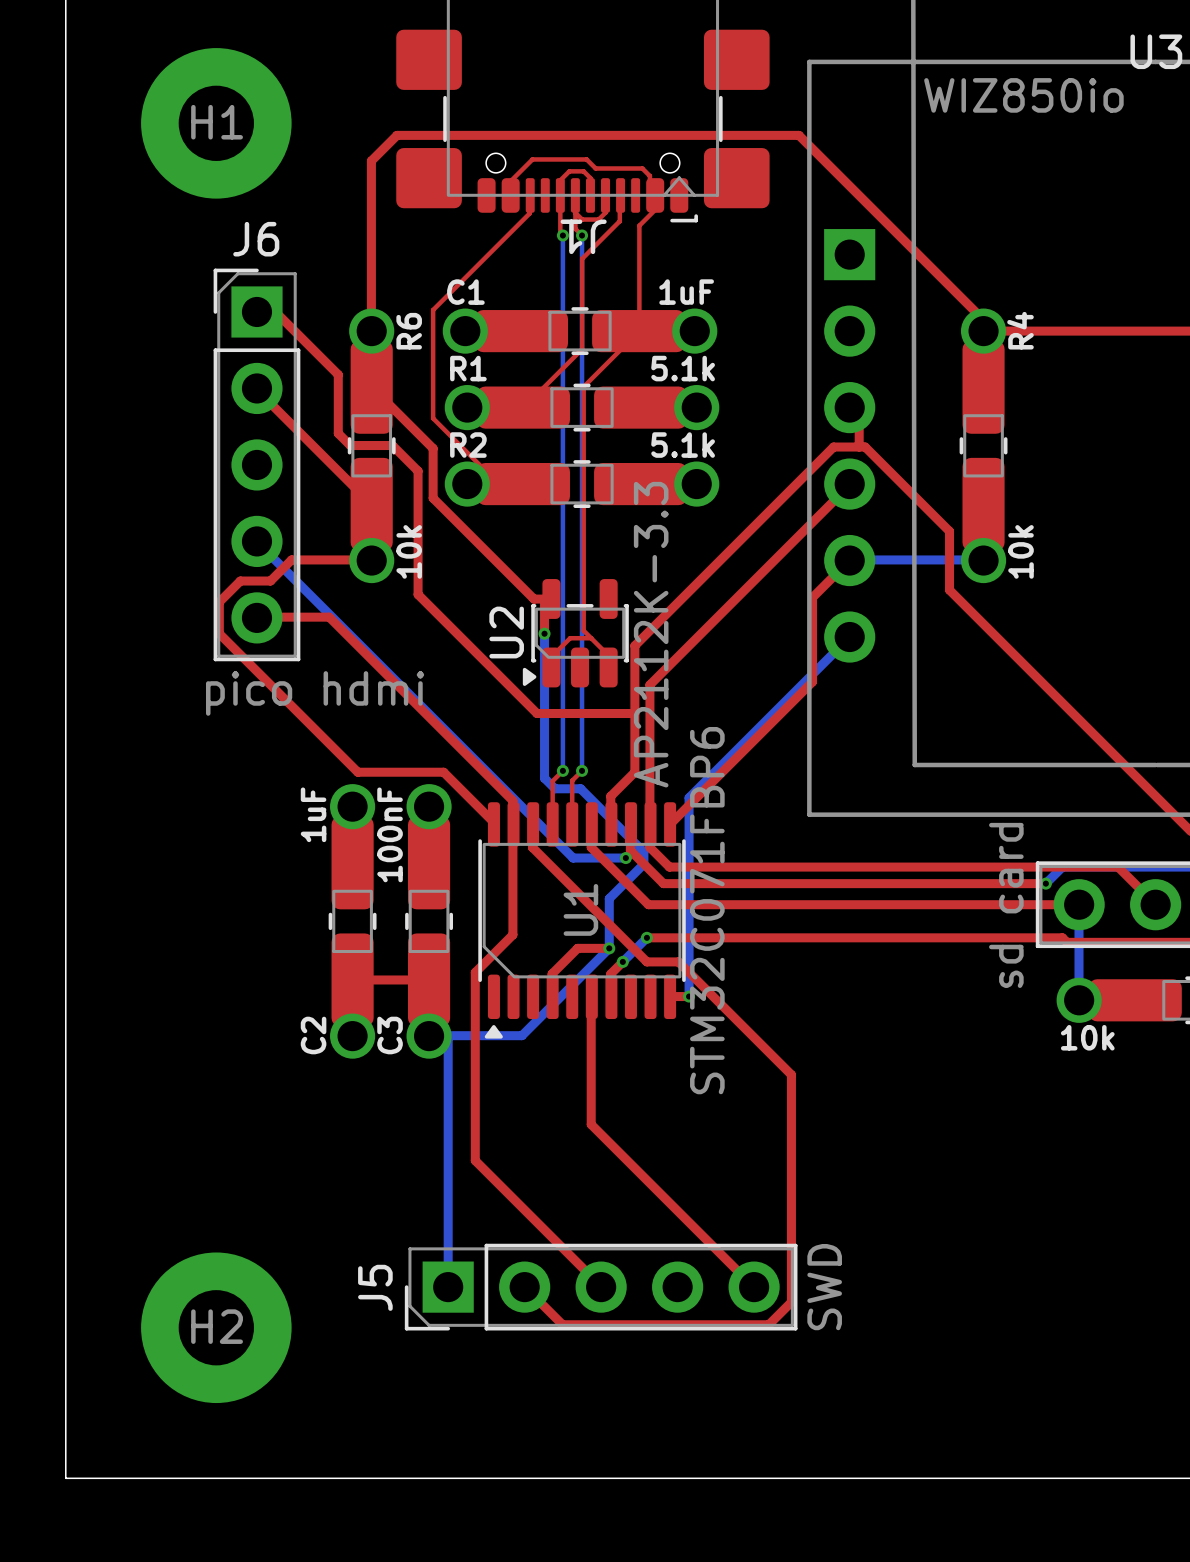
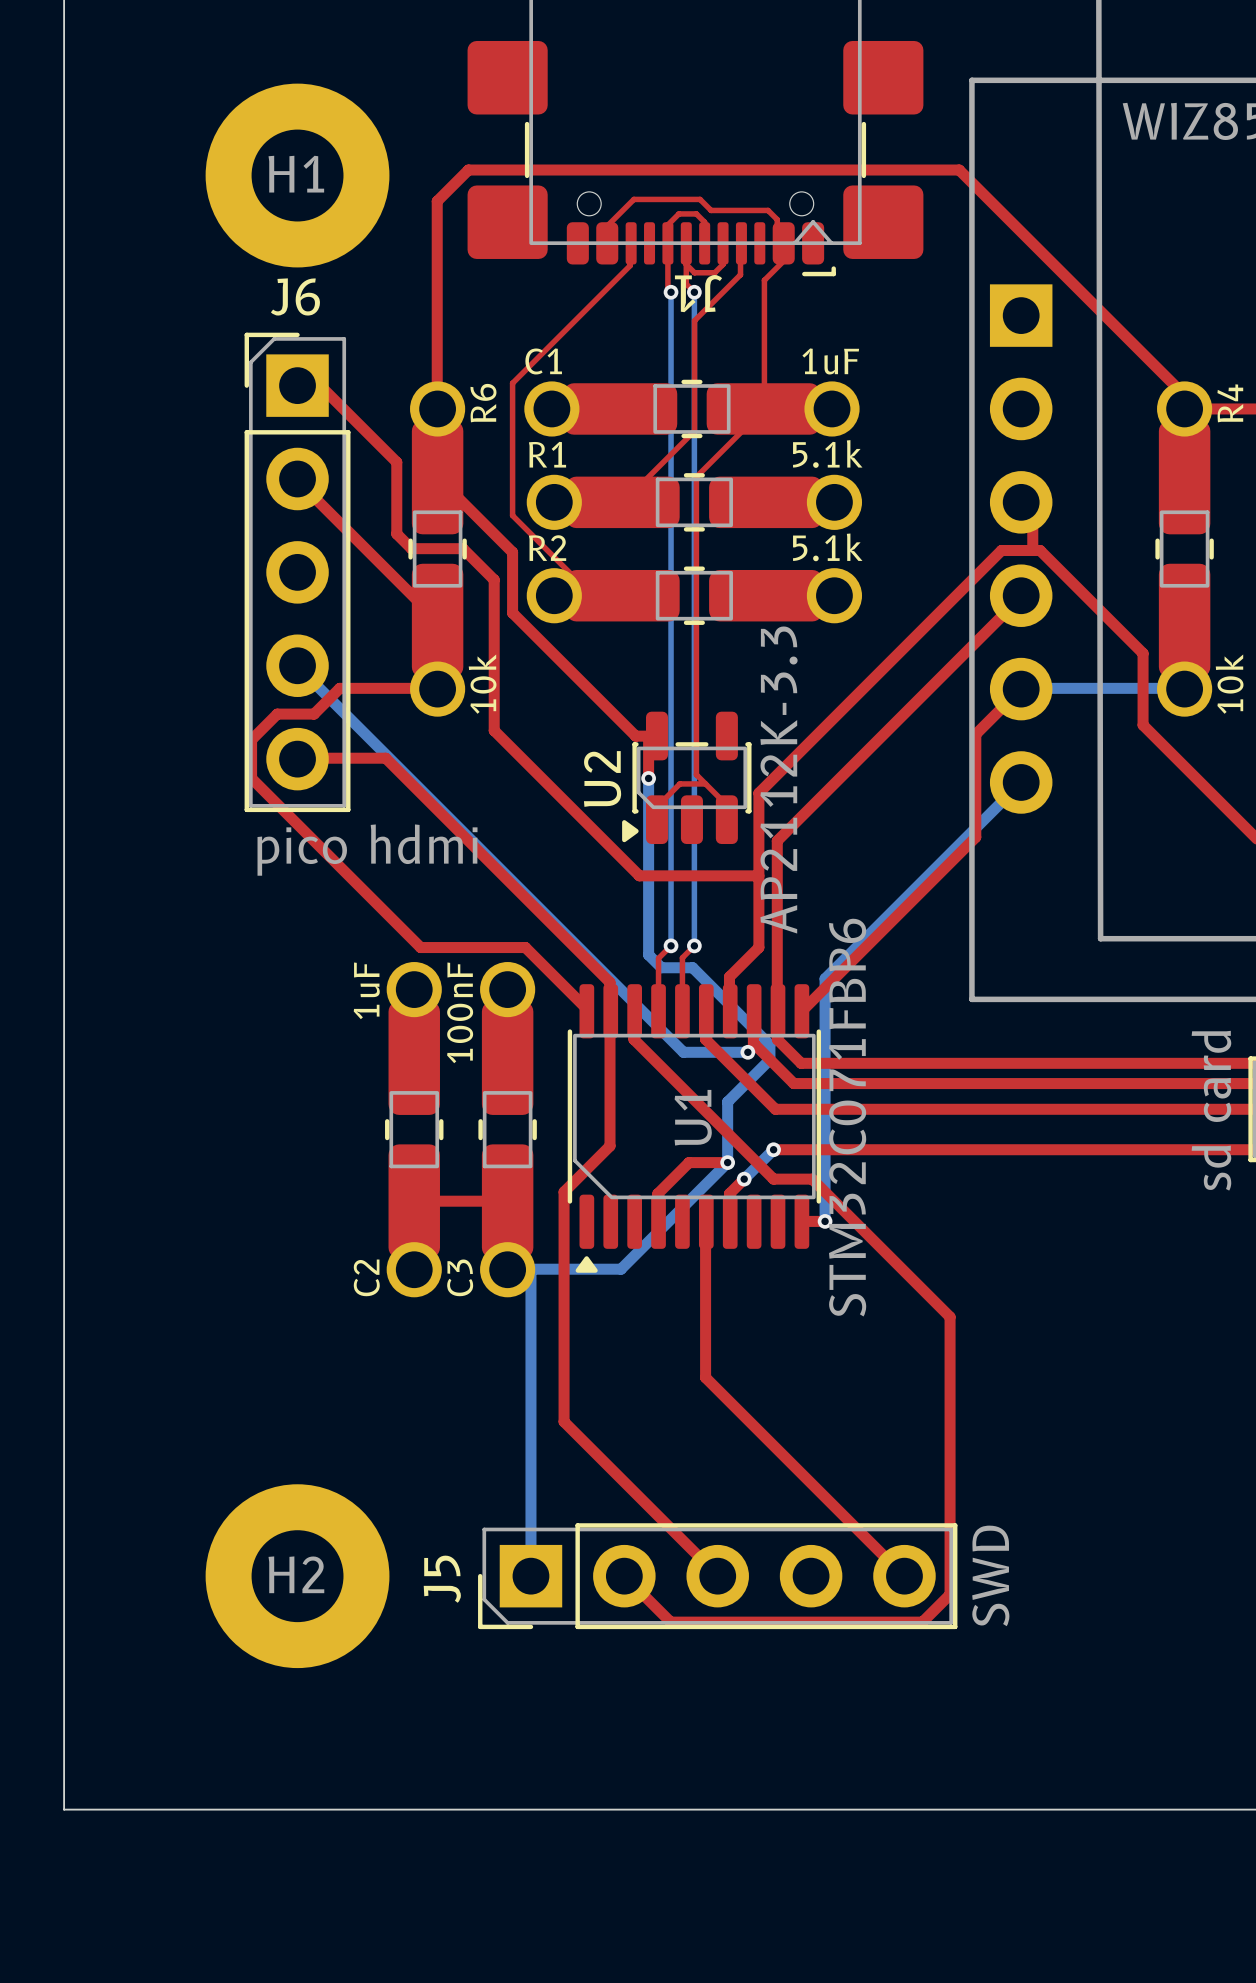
H1 position: (216, 123) -> (297, 175)
H2 position: (216, 1327) -> (297, 1576)

